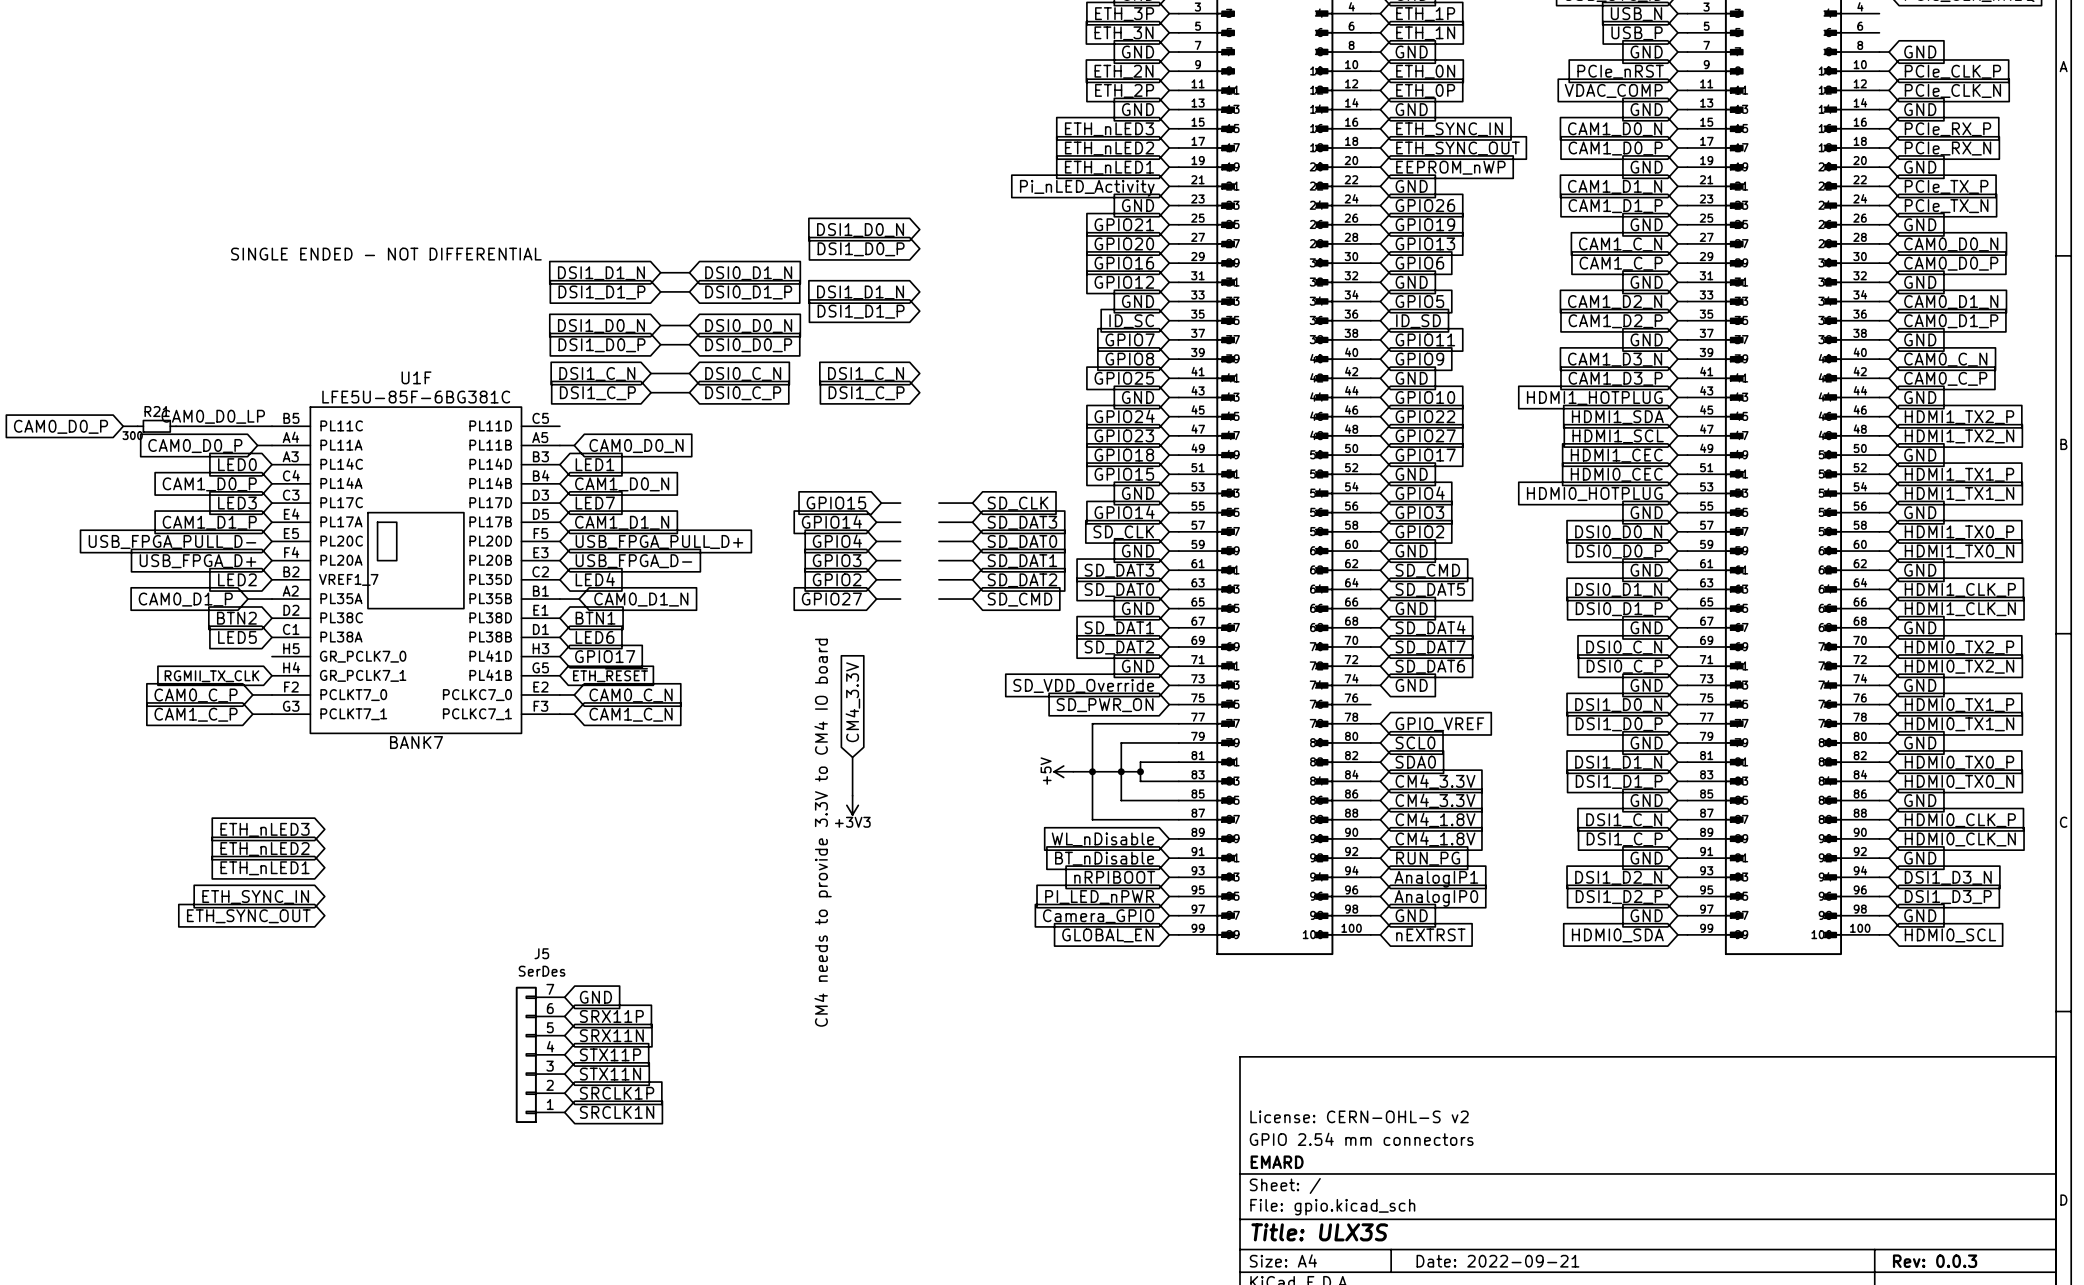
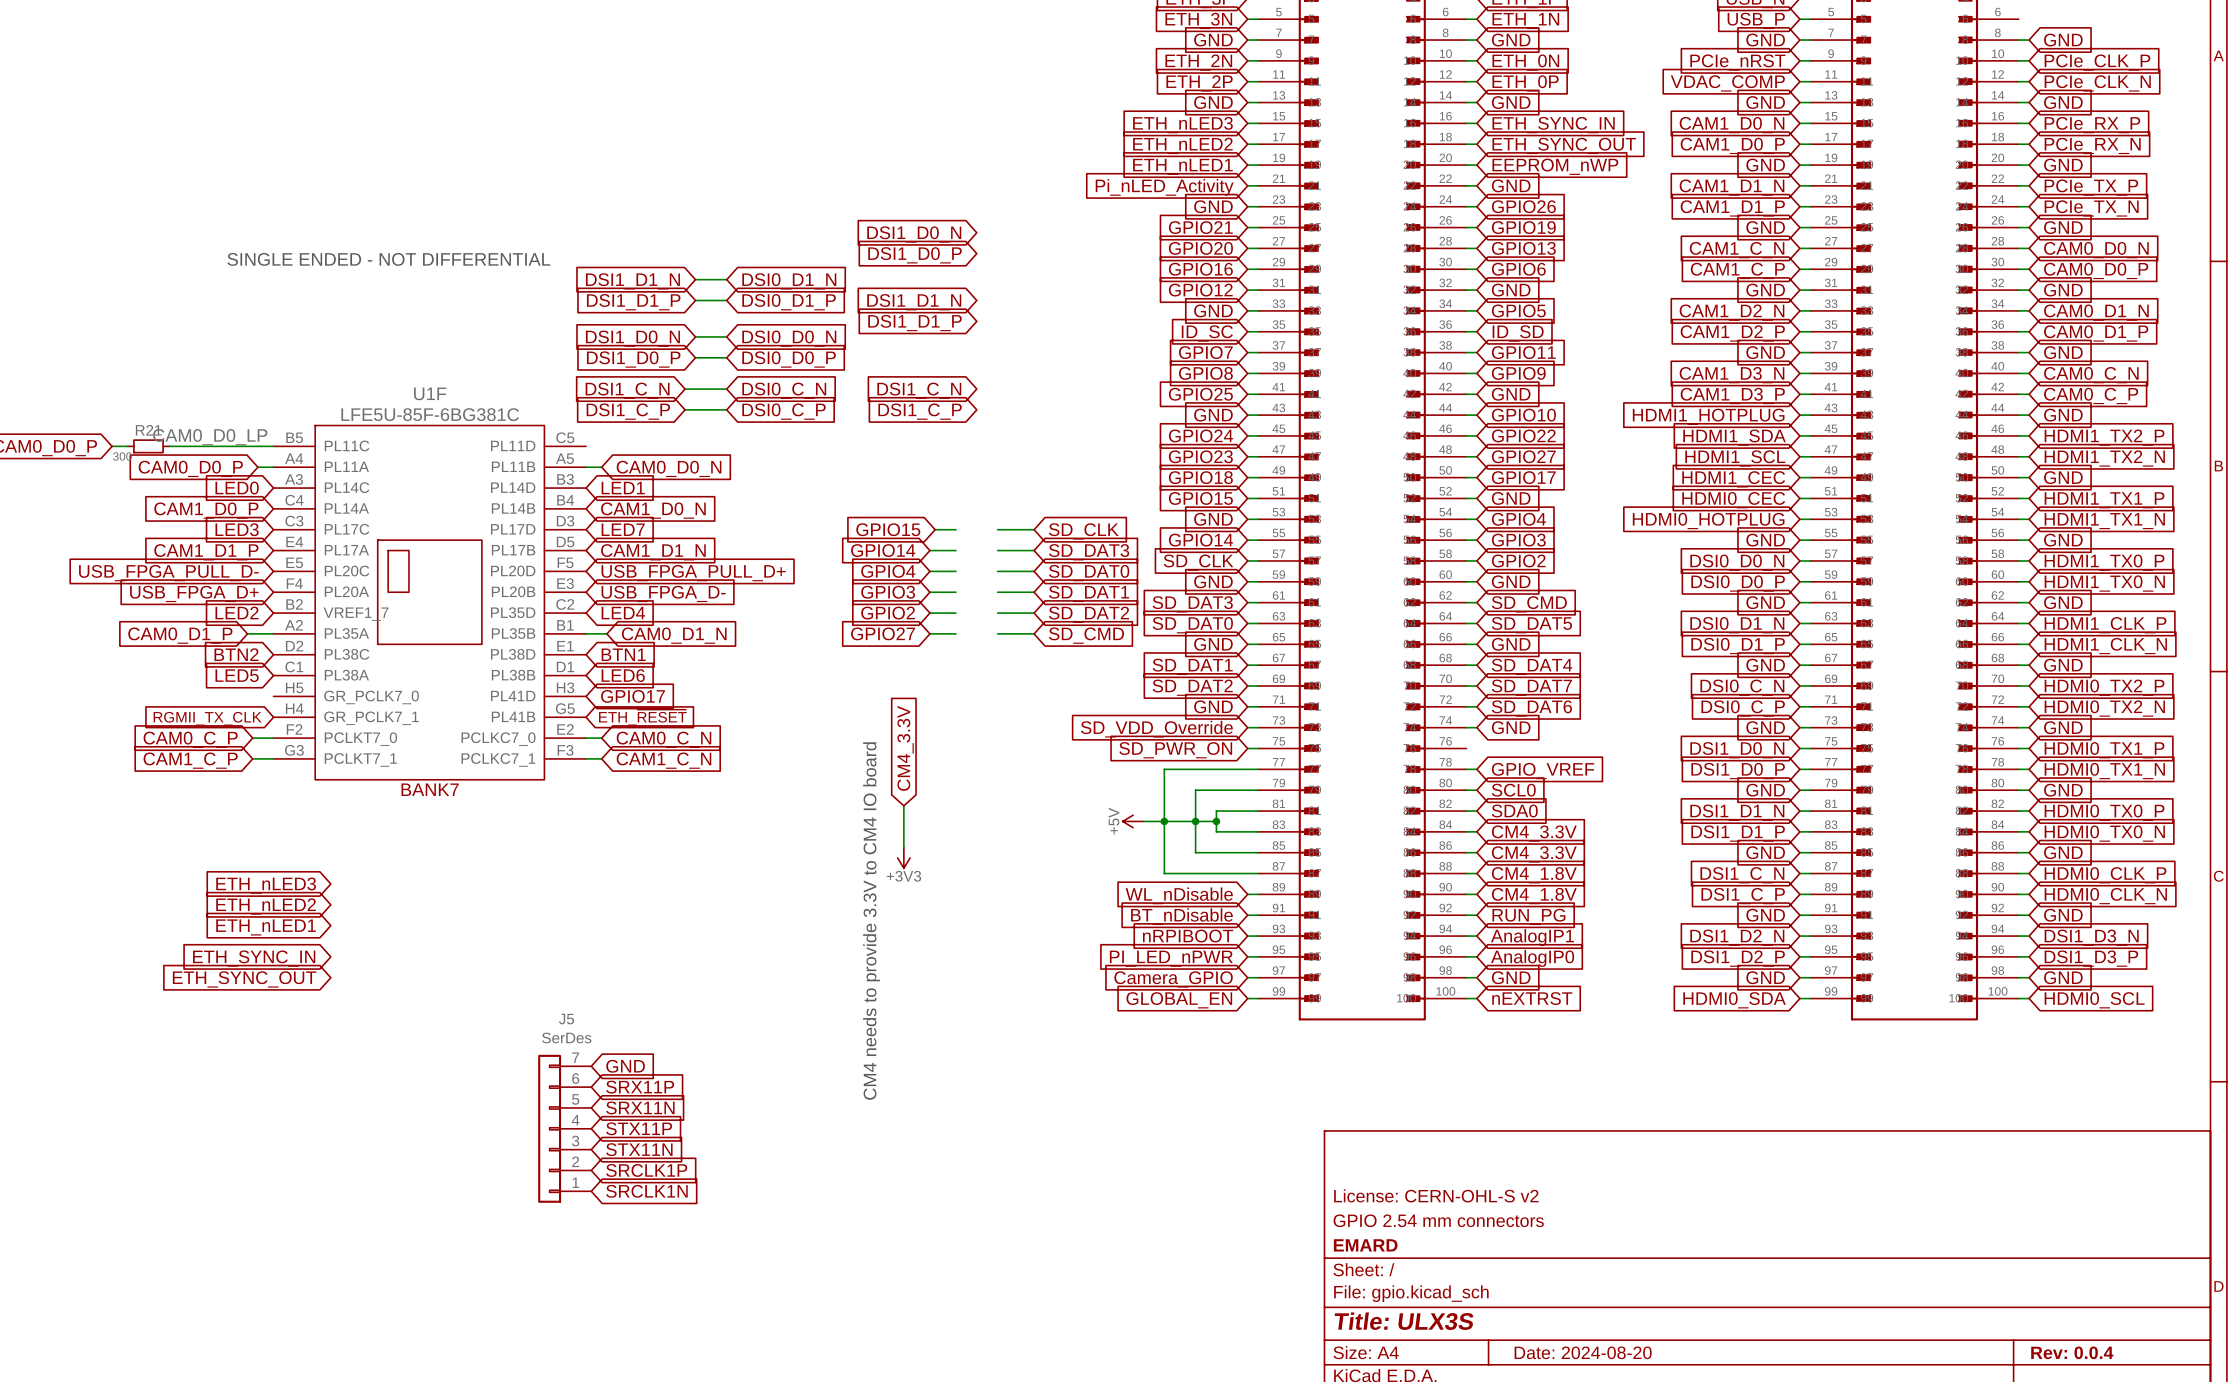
title block: Date: 2022-09-21 (1497, 1261) -> Date: 2024-08-20 (1583, 1352)
title block: Rev: 0.0.3 (1935, 1261) -> Rev: 0.0.4 (2072, 1352)

